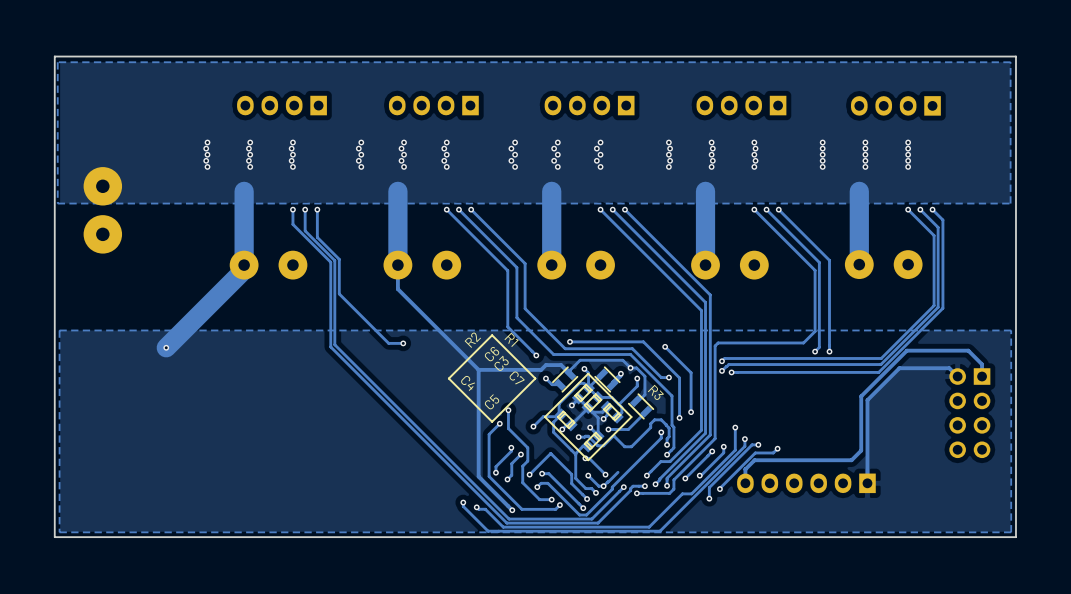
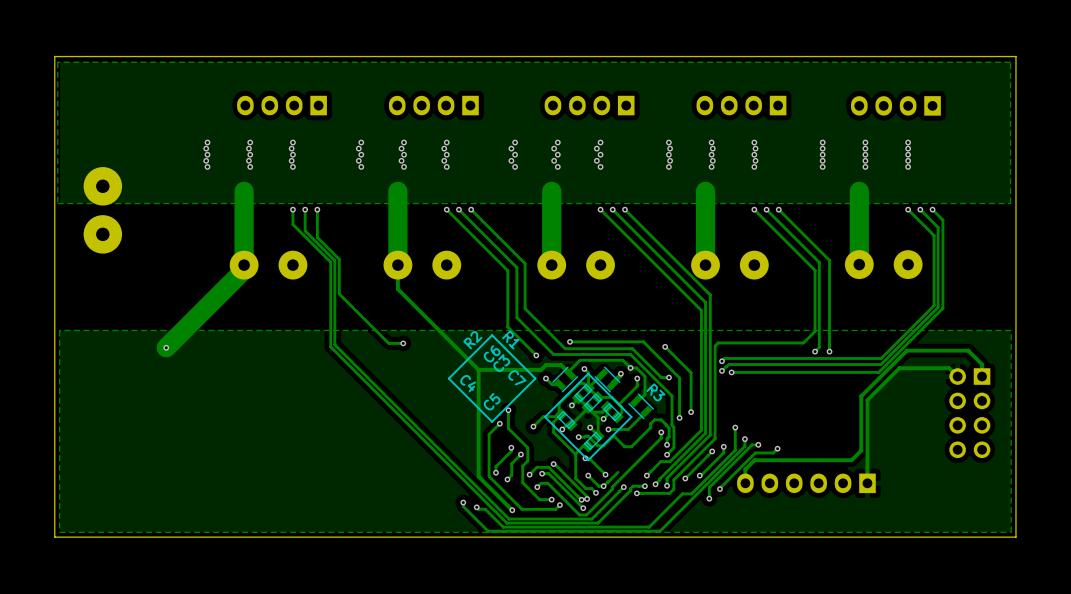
track: (550, 453) (536, 467) -> (581, 499) (548, 467) (536, 467)
track: (550, 453) (571, 474) (571, 483) (587, 499) -> none
track: none -> (553, 464) (588, 497)
via: none -> (553, 464)
via: none -> (581, 499)

